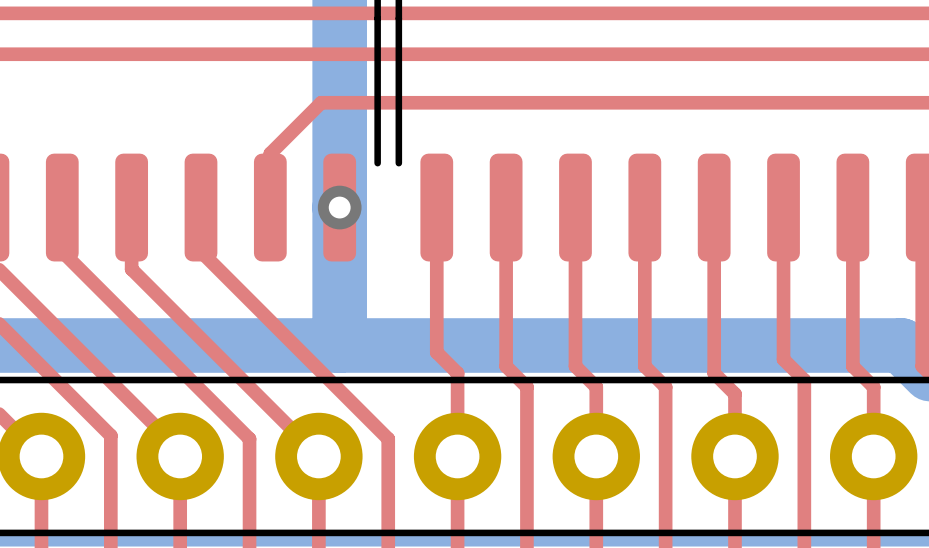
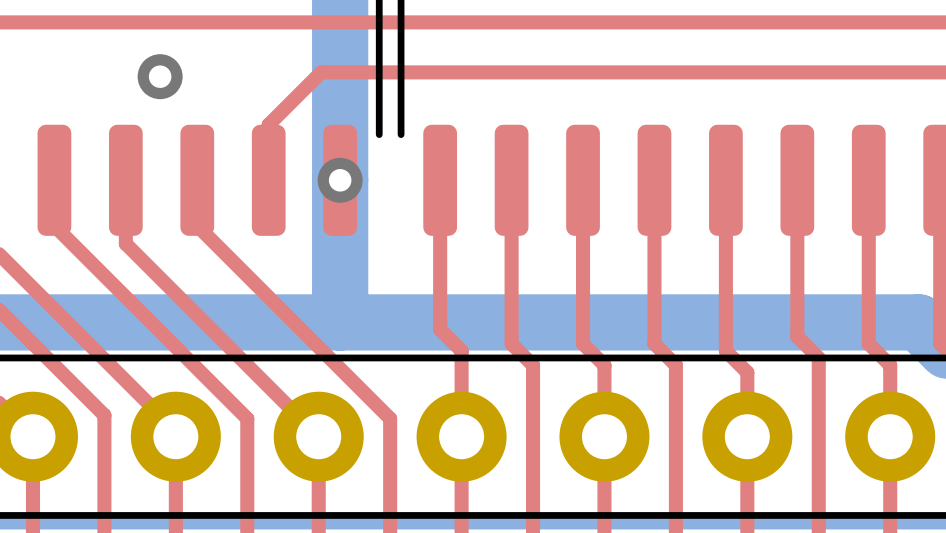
via: none -> (160, 76)

